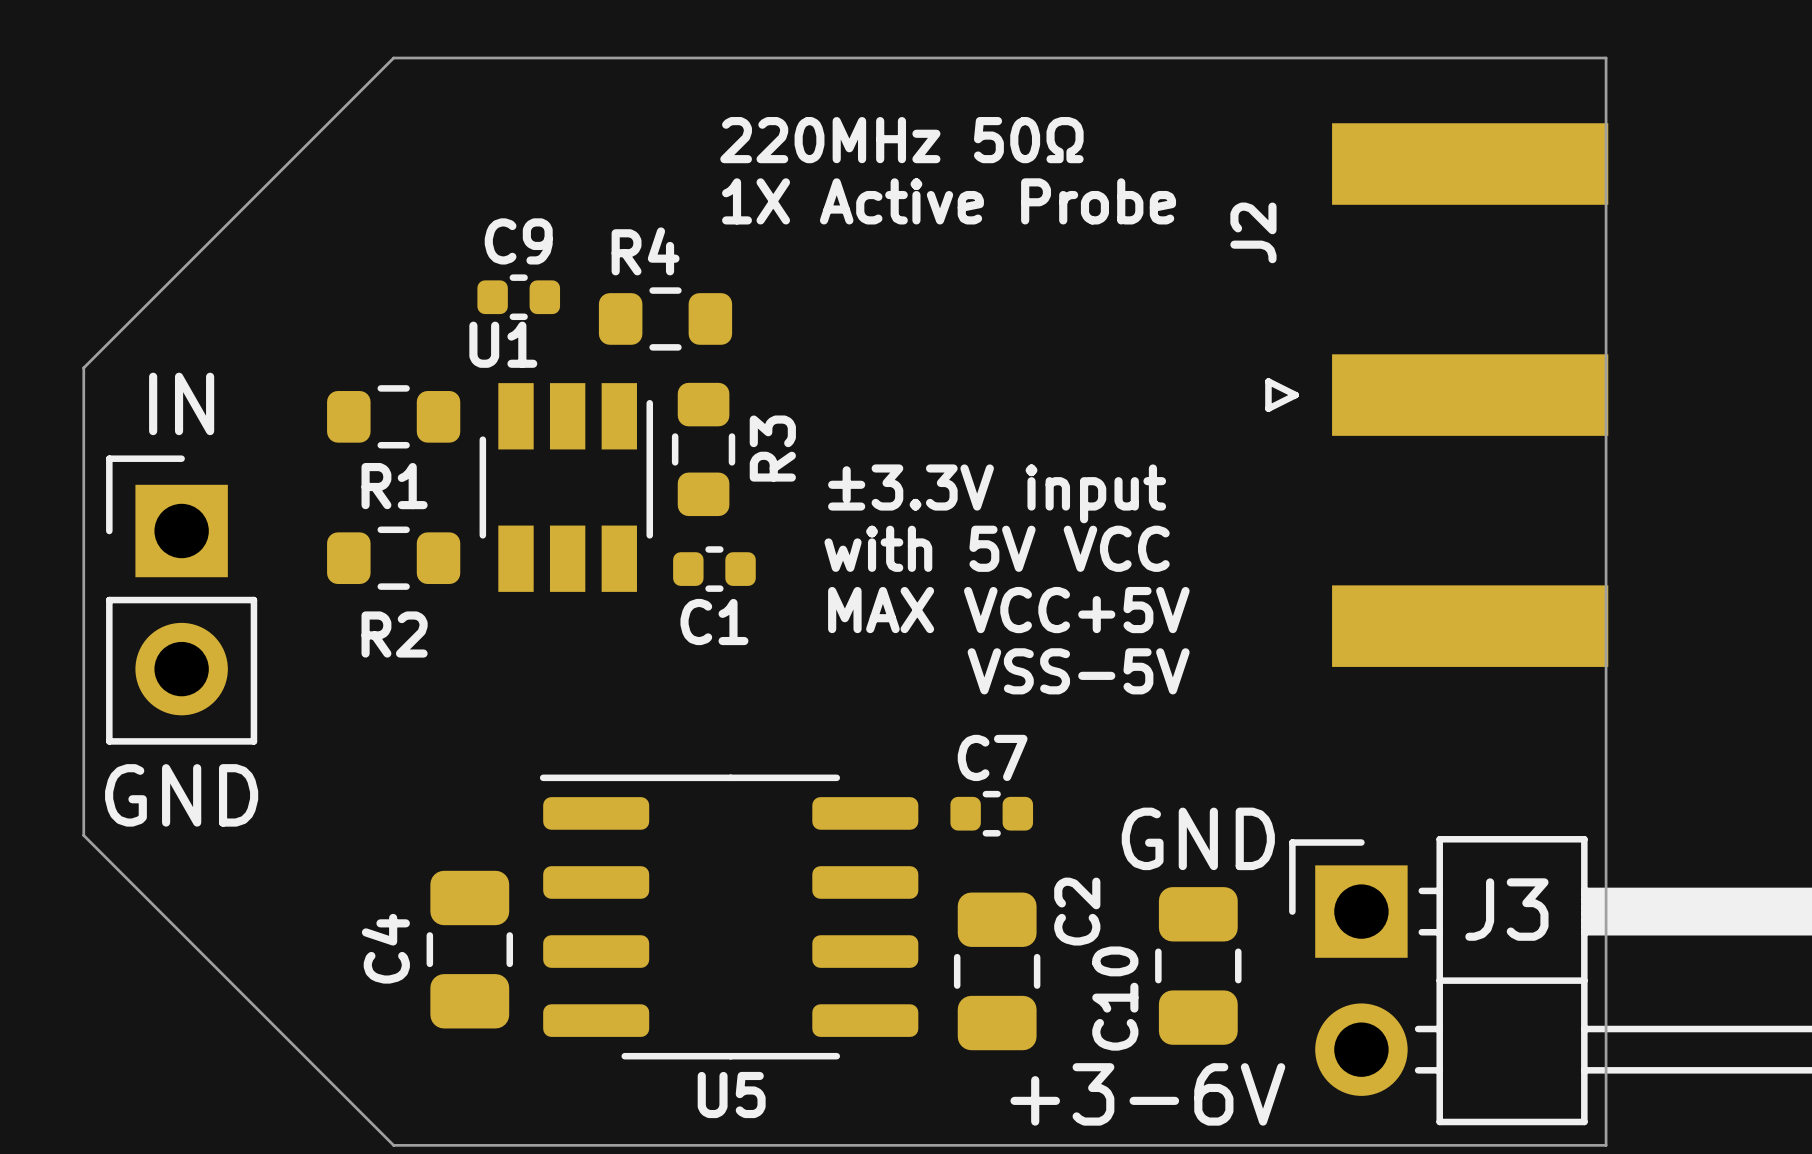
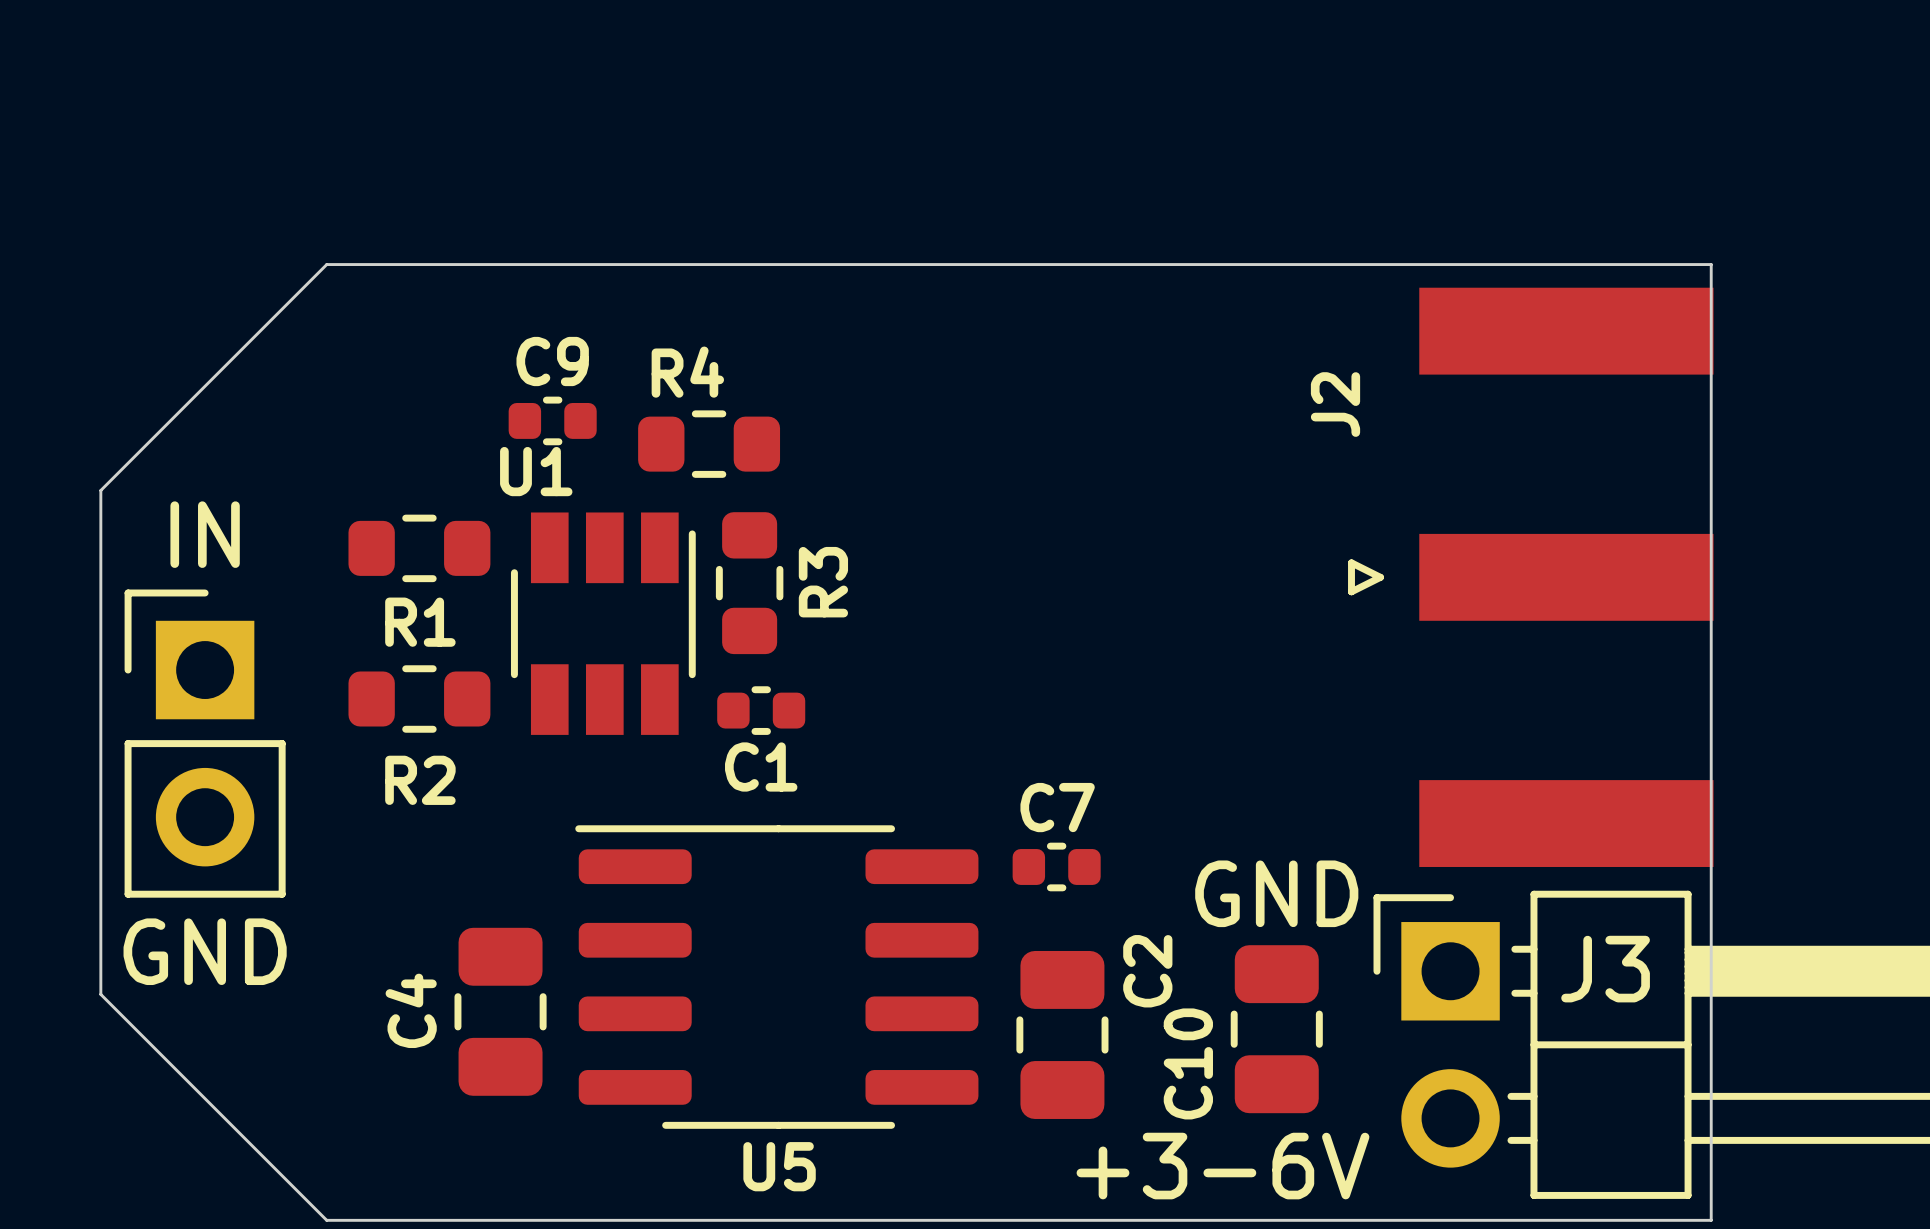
text: 220MHz 50Ω (901, 140) -> none
text: 1X Active Probe (949, 201) -> none
board edge: (1606, 248) (1606, 58) (393, 58) (83, 367) (83, 835) (393, 1145) -> (1711, 264) (326, 264) (100, 490) (100, 994) (326, 1220) (419, 1220)
C9 position: (518, 297) -> (552, 420)
R4 position: (665, 318) -> (709, 444)
J2 position: (1436, 395) -> (1530, 577)
R1 position: (393, 416) -> (419, 548)
R3 position: (703, 449) -> (749, 583)
U1 position: (566, 487) -> (603, 623)
text: ±3.3V input (997, 493) -> none
text: with 5V VCC (997, 548) -> none
R2 position: (393, 558) -> (419, 699)
C1 position: (714, 569) -> (761, 710)
part position: (181, 600) -> (205, 743)
text: MAX VCC+5V (1008, 610) -> none
text: VSS-5V (1078, 671) -> none

